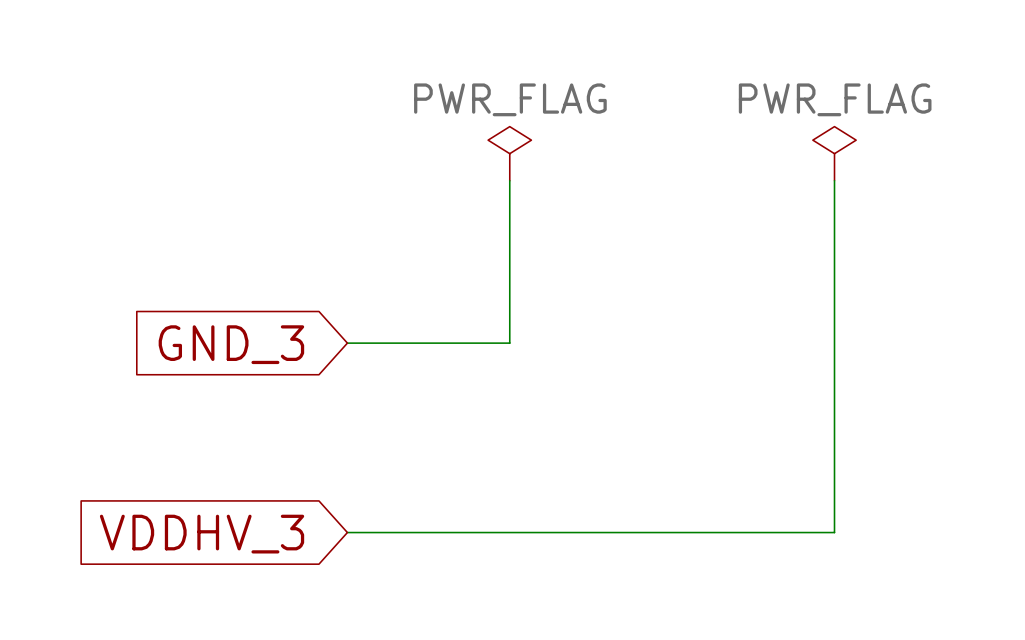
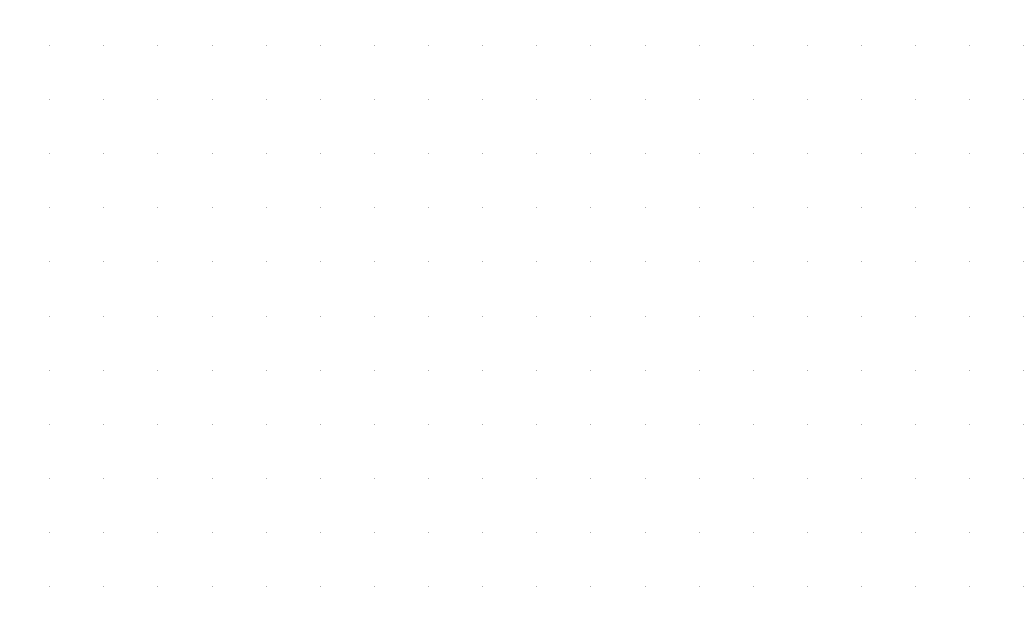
power symbol: PWR_FLAG (509, 153) -> none
power symbol: PWR_FLAG (834, 153) -> none
wire: (509, 180) (509, 343) (347, 343) -> none
wire: (834, 180) (834, 532) (347, 532) -> none
global label: GND_3 (231, 344) -> none
global label: VDDHV_3 (202, 534) -> none

